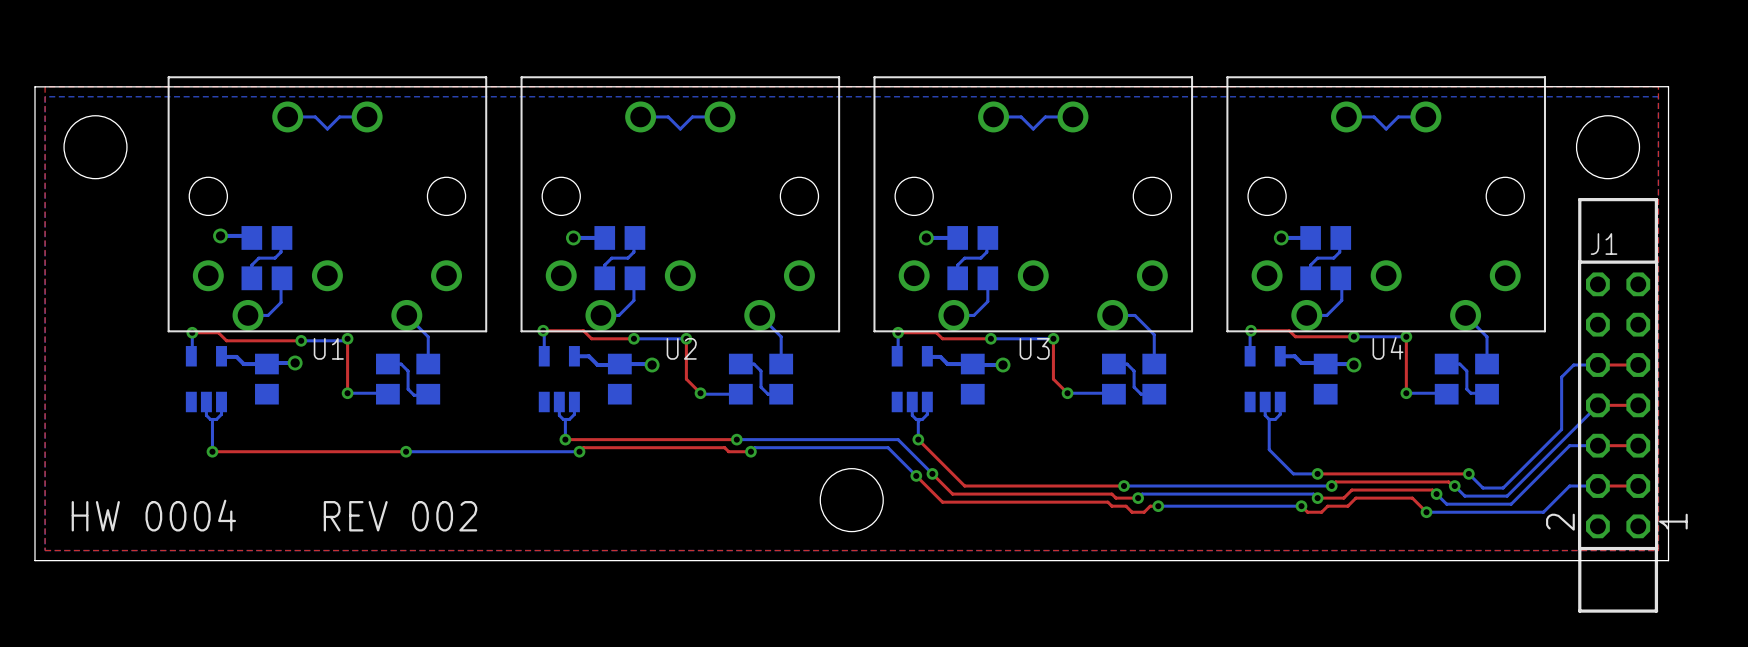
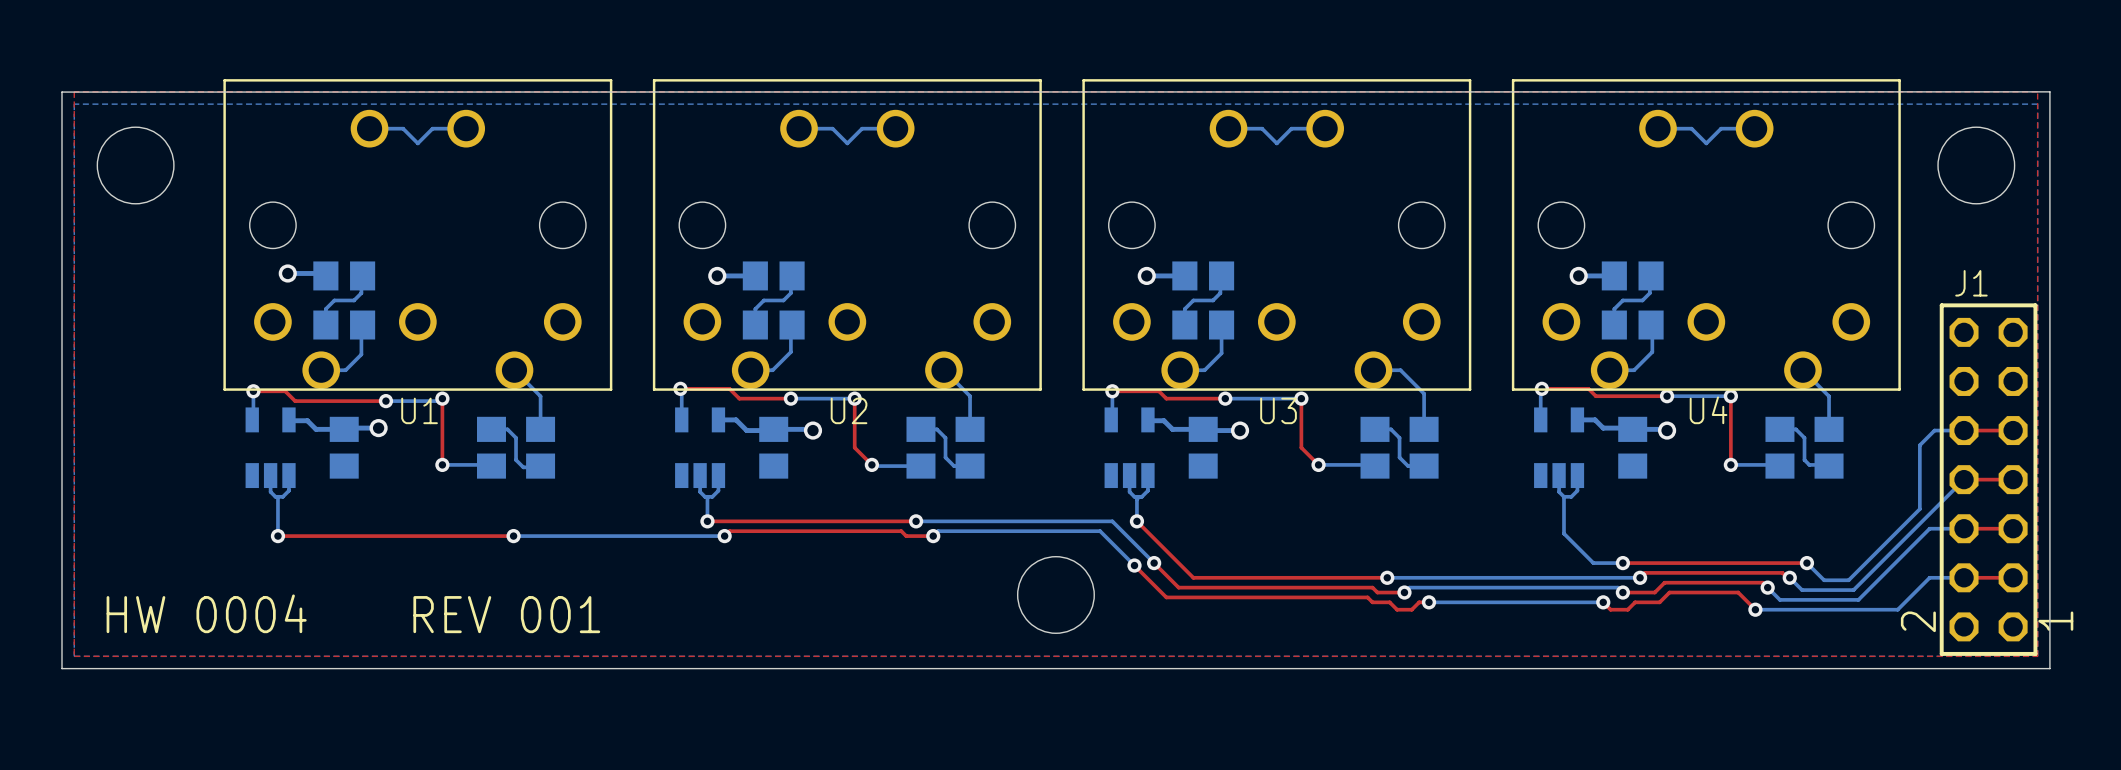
J1 footprint: [1577, 197, 1659, 613] -> [1939, 303, 2038, 656]
text: REV 002 (400, 516) -> REV 001 (506, 614)

